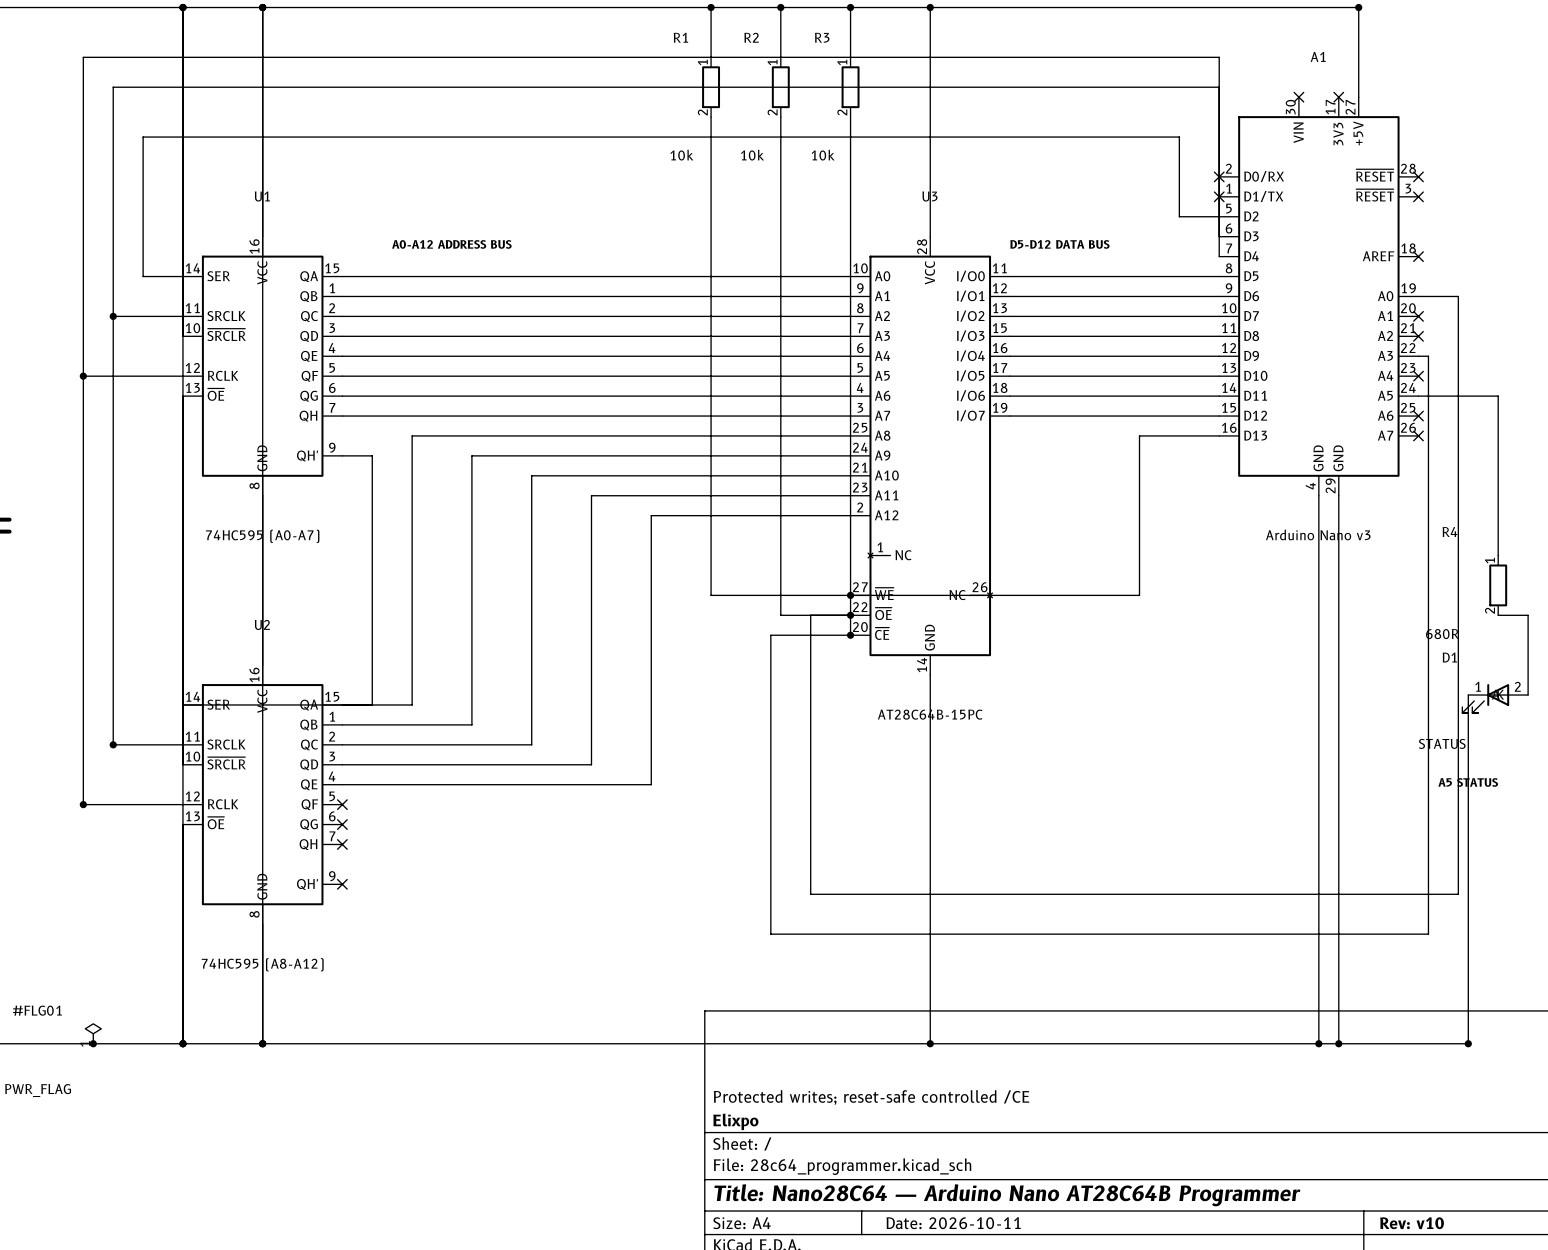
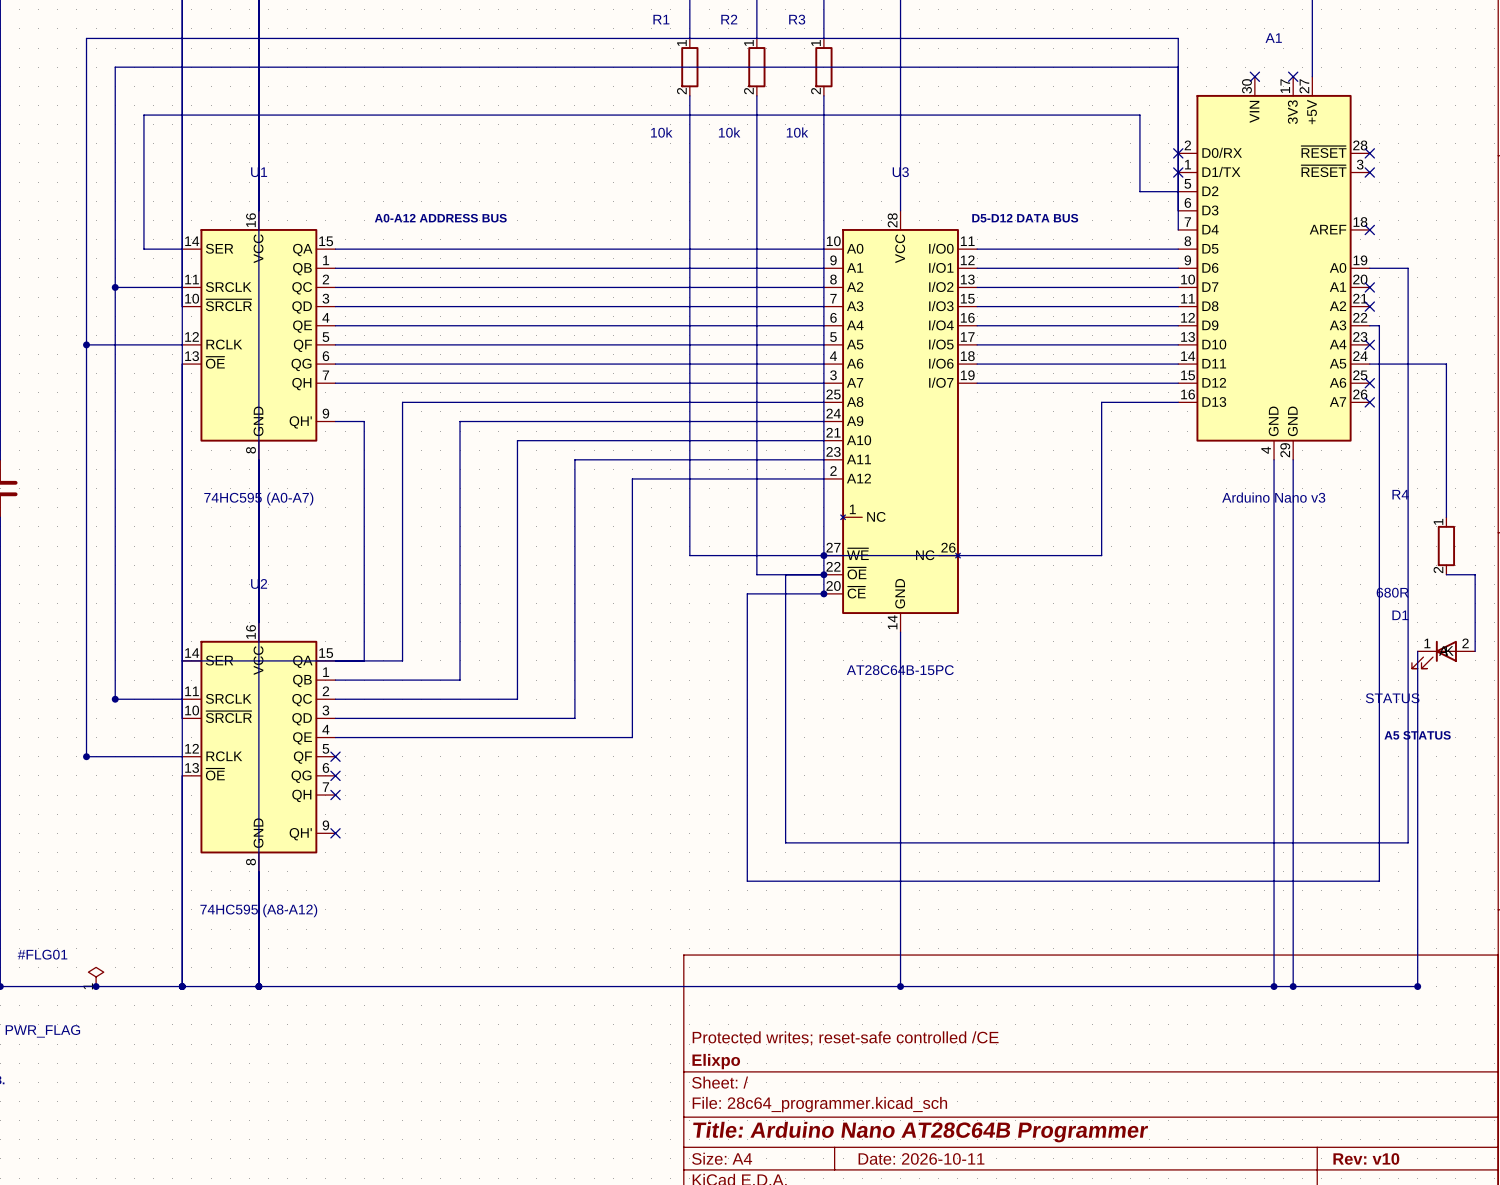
title block: Title: Nano28C64 — Arduino Nano AT28C64B Programmer (1007, 1195) -> Title: Arduino Nano AT28C64B Programmer (920, 1132)

